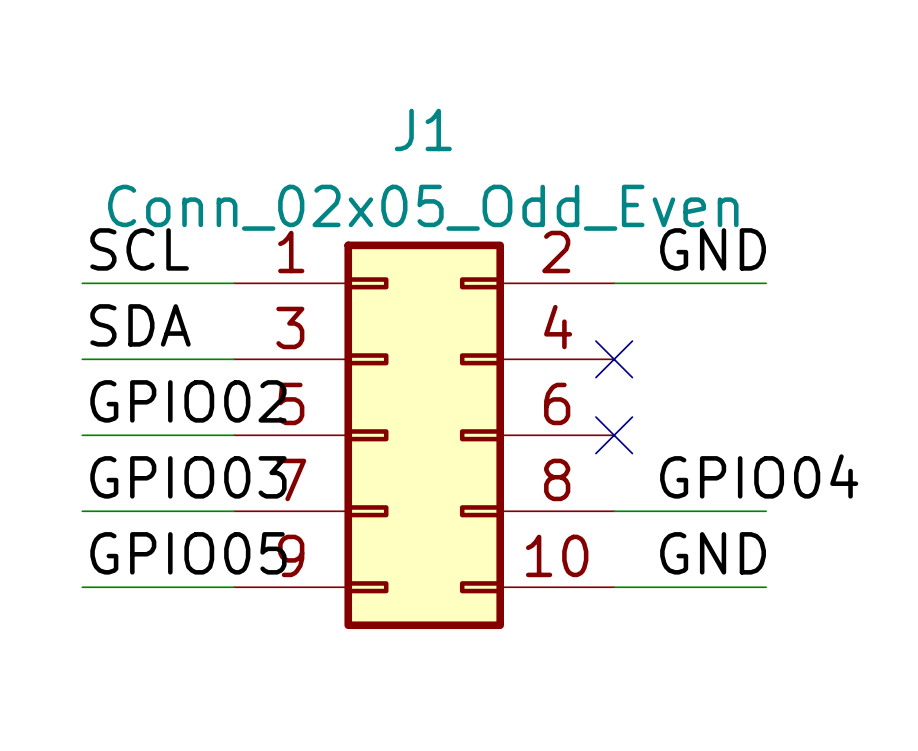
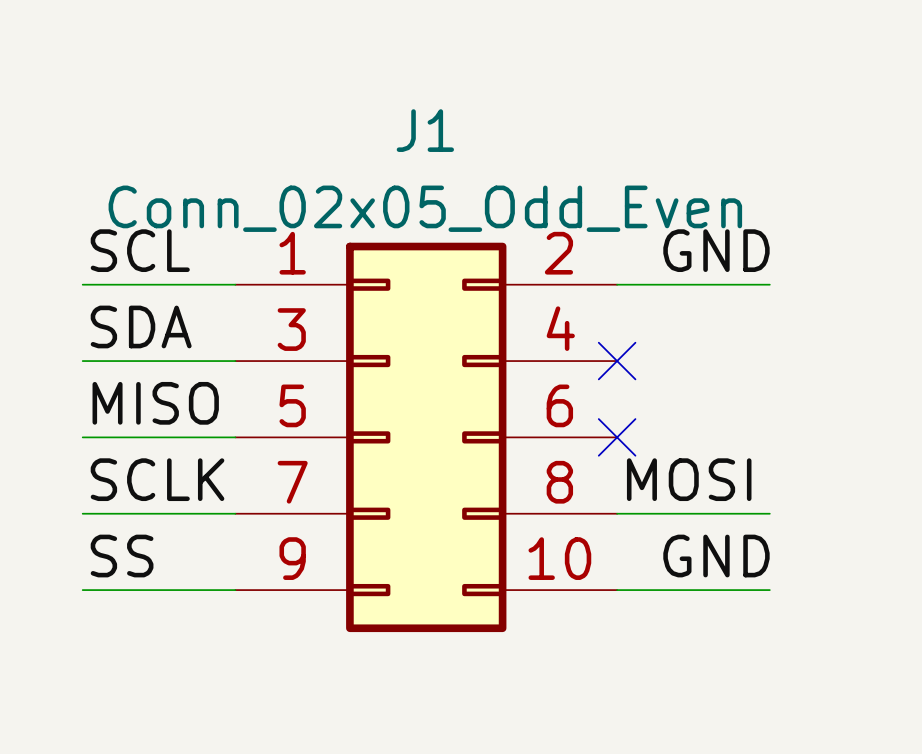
label: GPIO02 (188, 401) -> MISO (155, 403)
label: GPIO04 (759, 476) -> none
label: GPIO03 (188, 477) -> SCLK (157, 479)
label: none -> MOSI (689, 479)
label: GPIO05 (188, 553) -> SS (122, 556)

